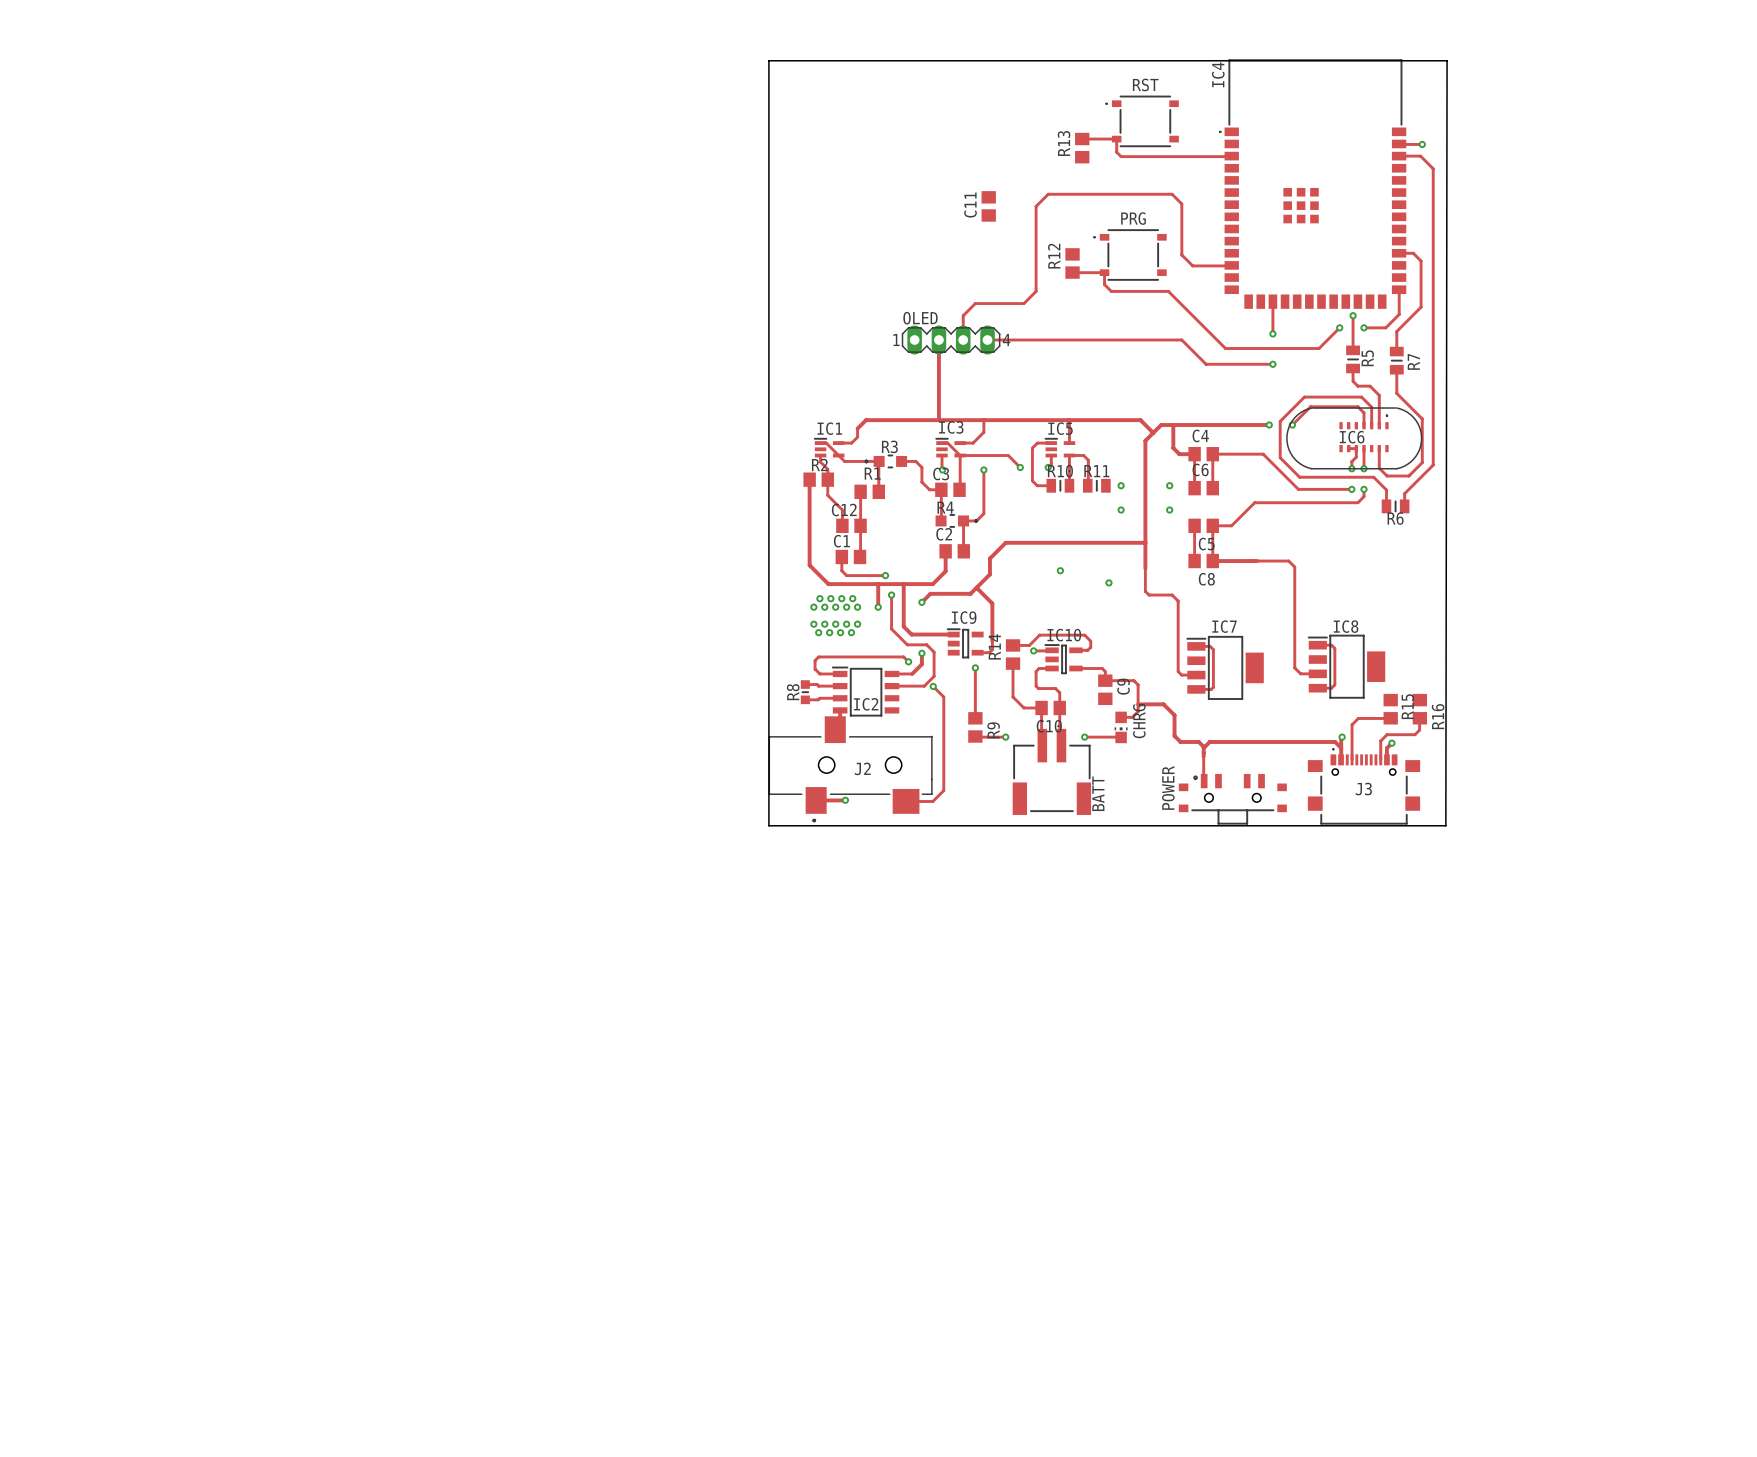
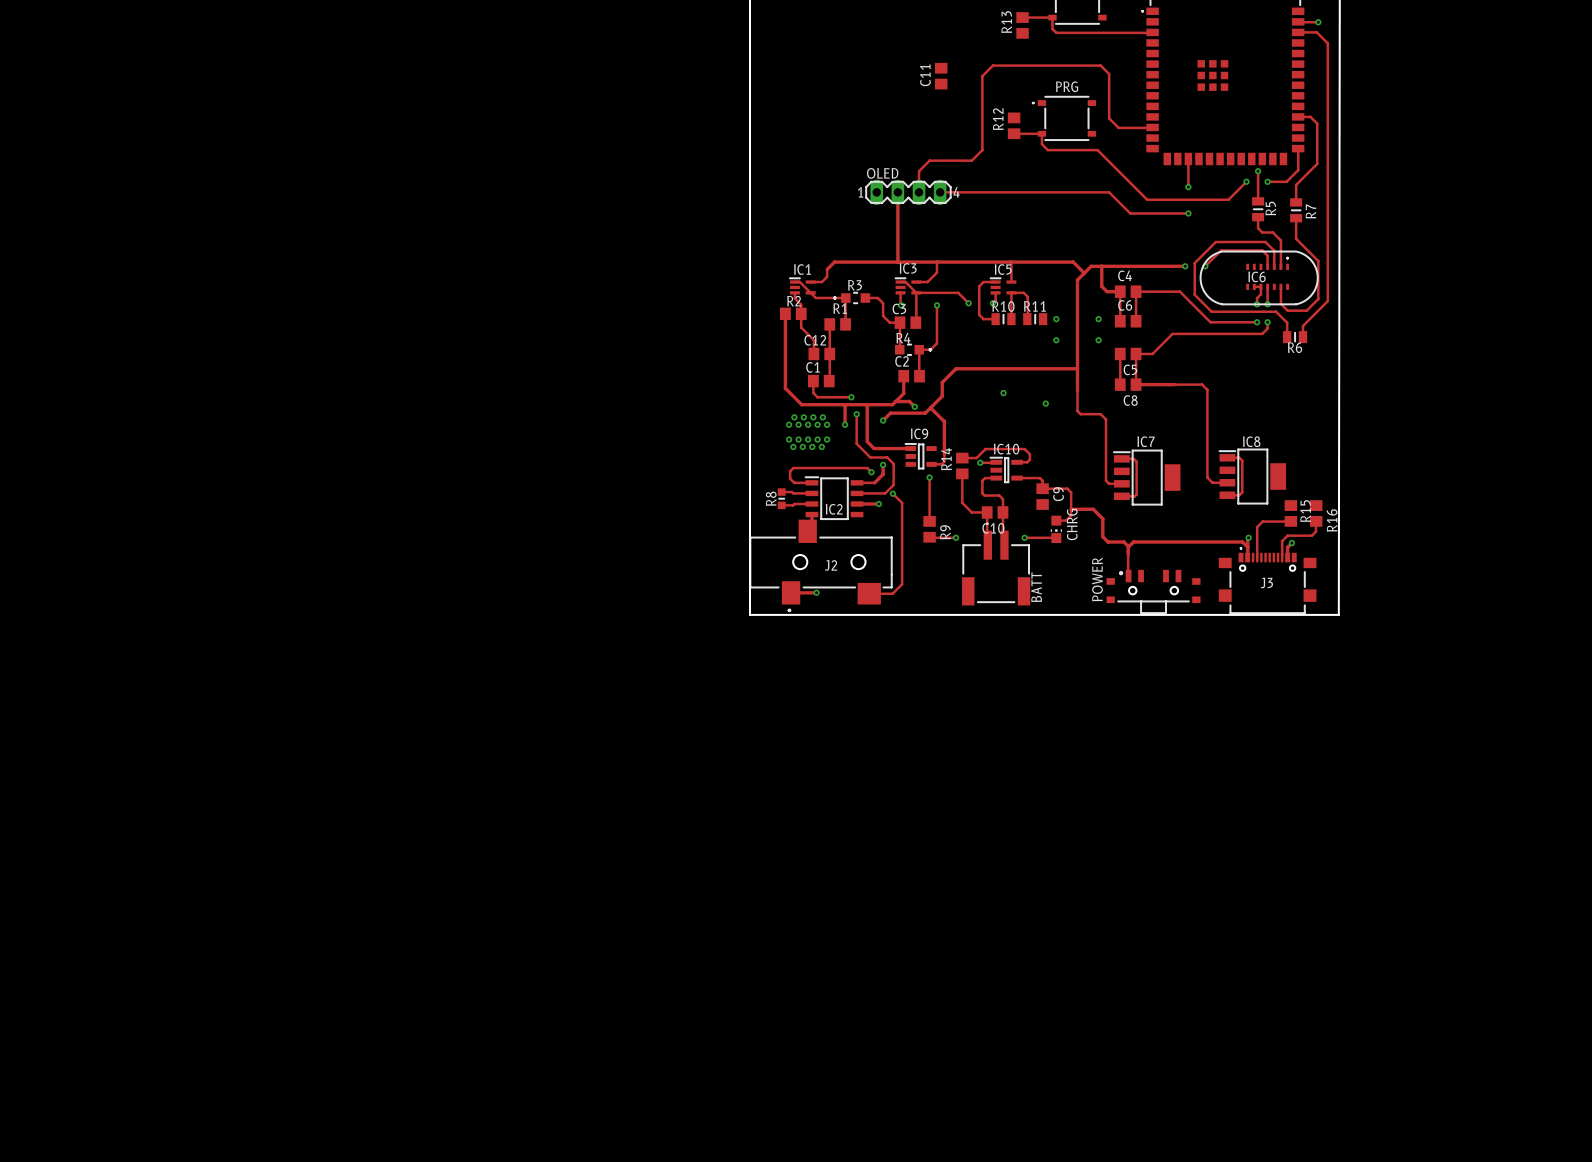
track: none -> (895, 401) (909, 401) (914, 406)
via: none -> (914, 406)
track: none -> (857, 503) (878, 503)
via: none -> (878, 503)

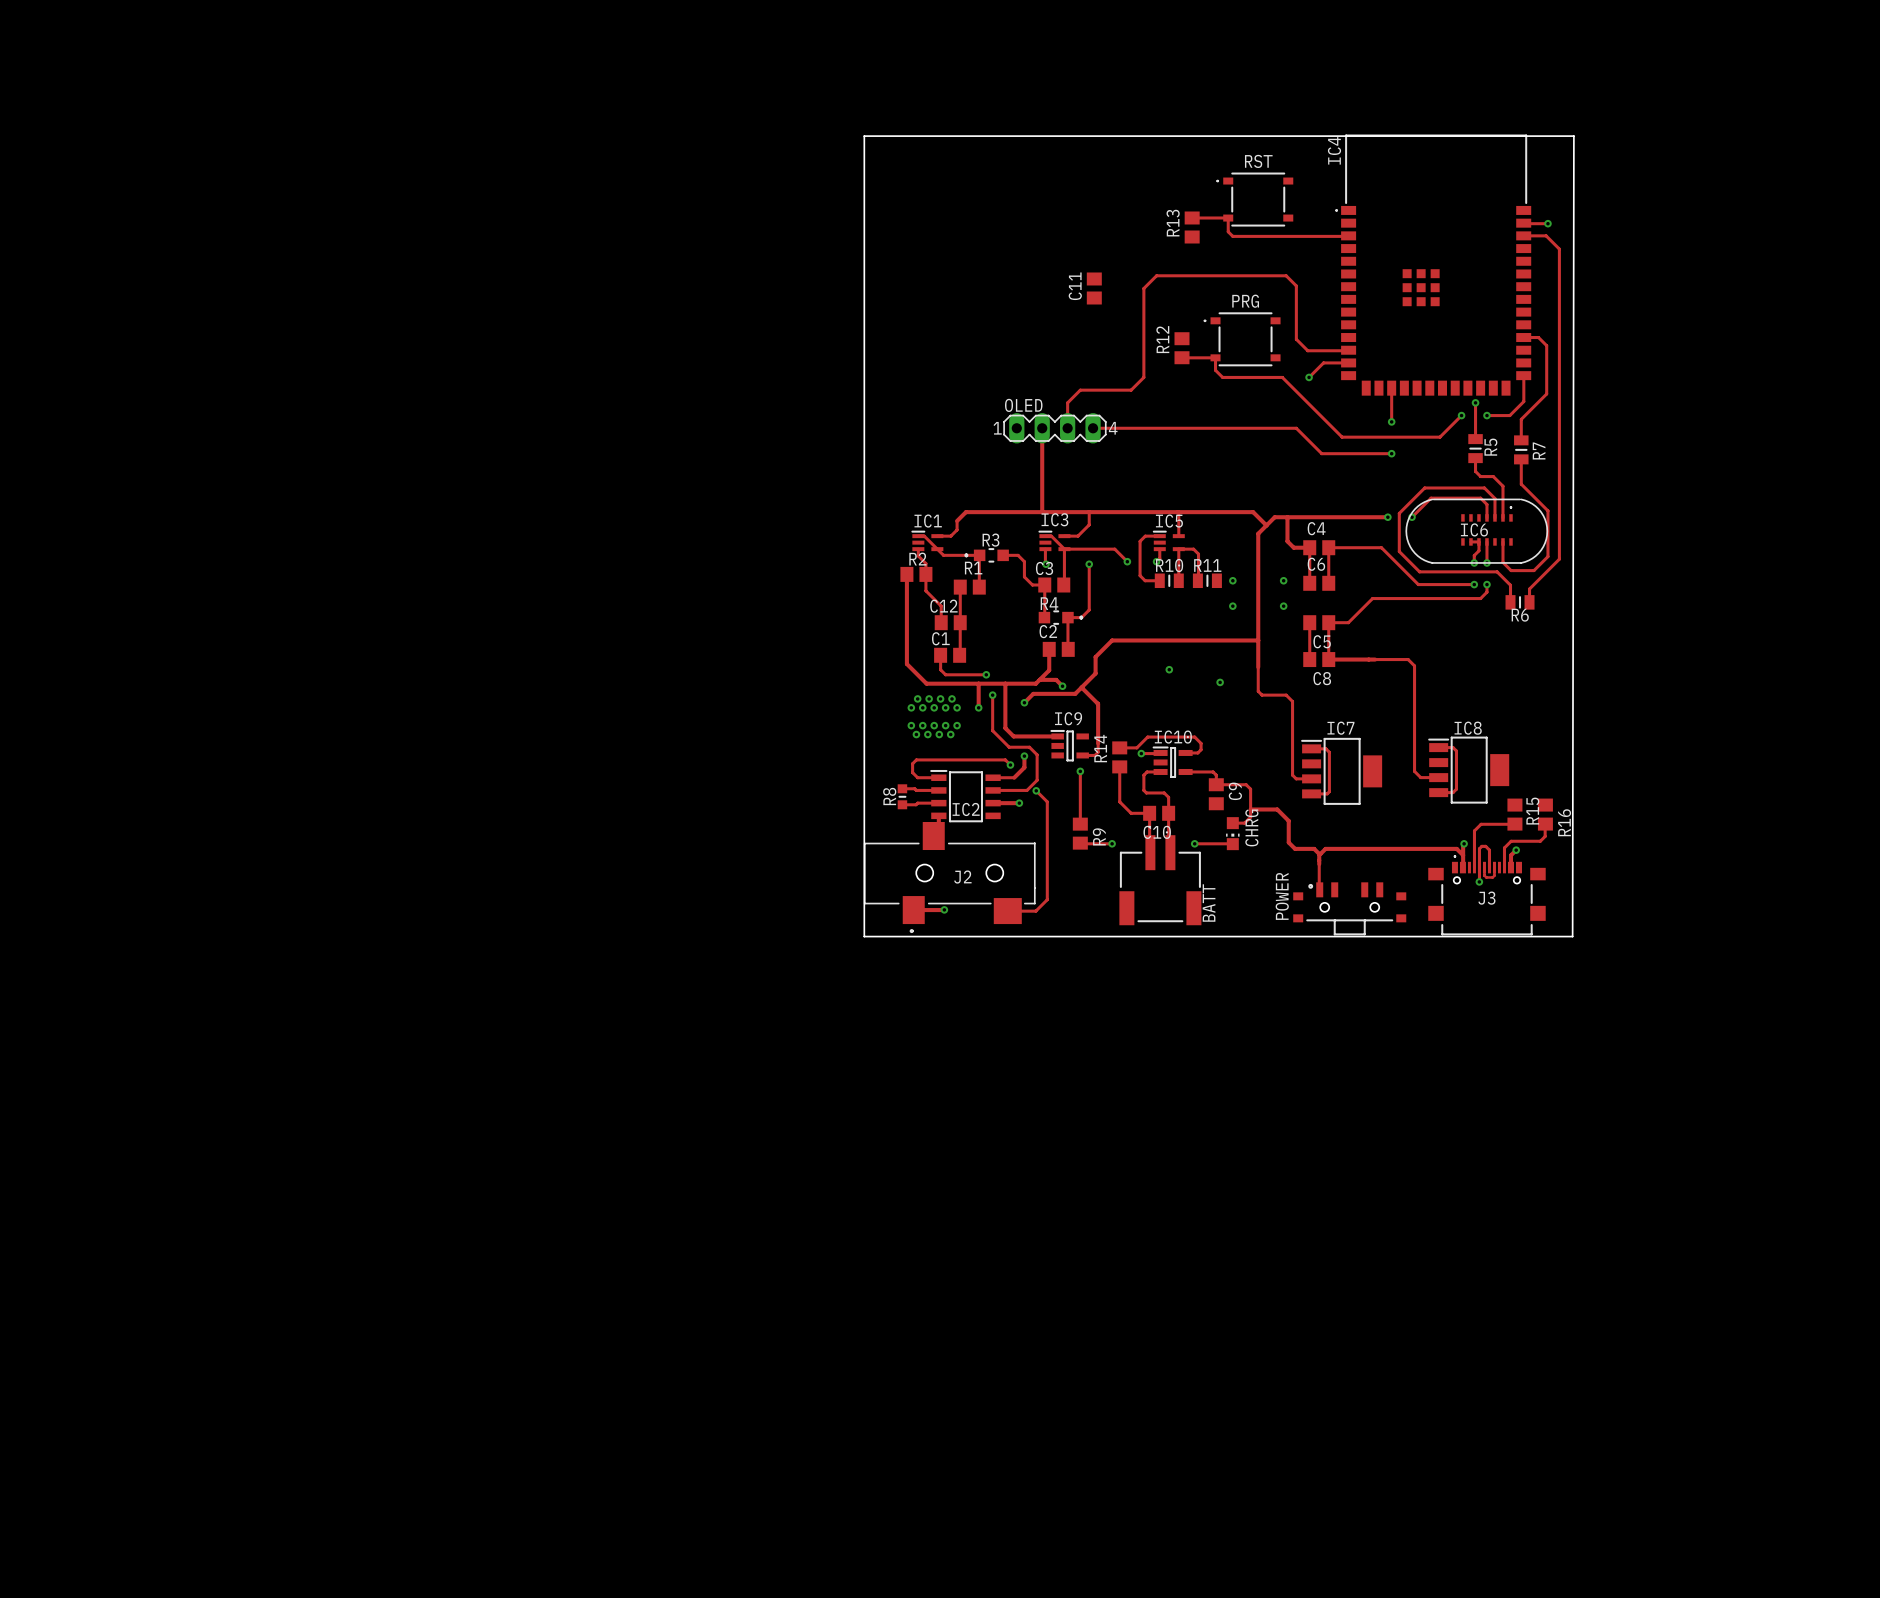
track: none -> (1348, 362) (1323, 362) (1309, 377)
via: none -> (1309, 377)
track: none -> (1484, 867) (1486, 877) (1494, 875) (1494, 867)
track: none -> (1489, 867) (1489, 850) (1485, 846) (1481, 846) (1479, 848) (1479, 881)
via: none -> (1479, 881)

